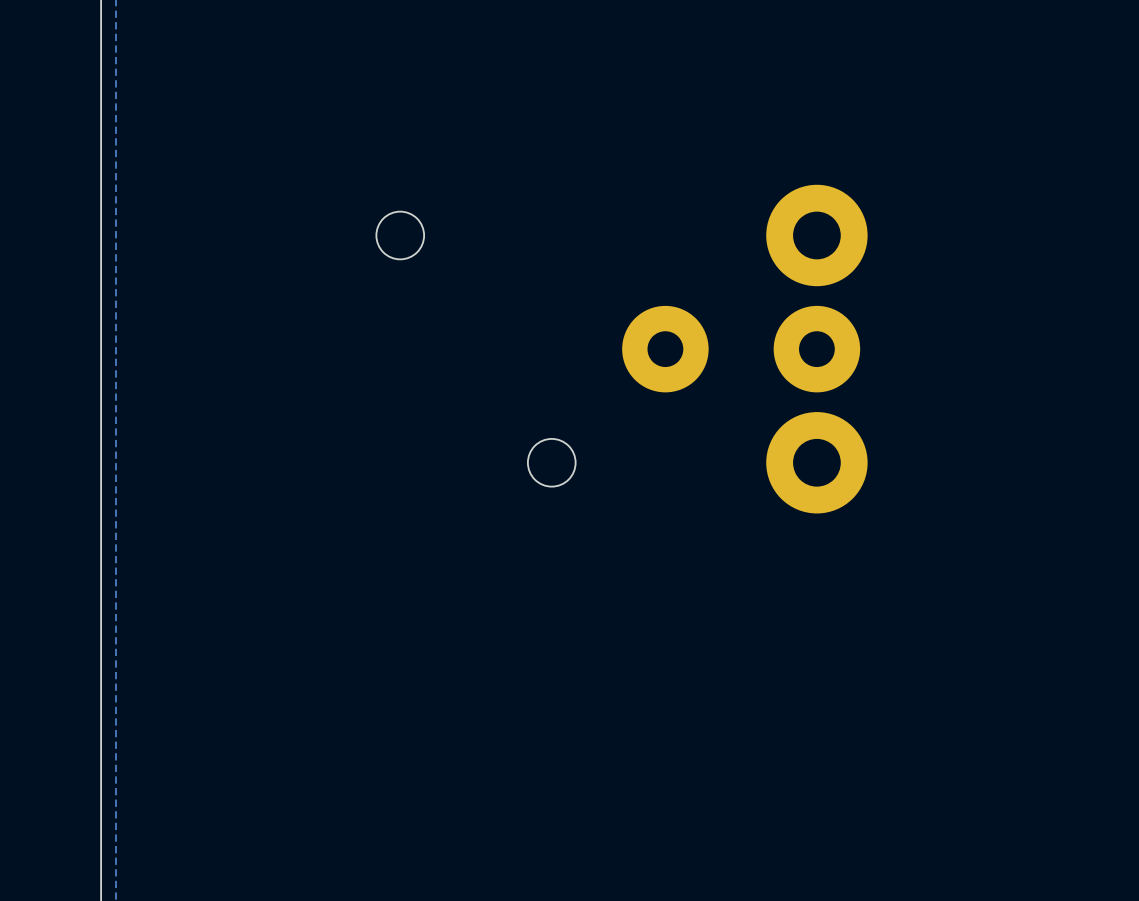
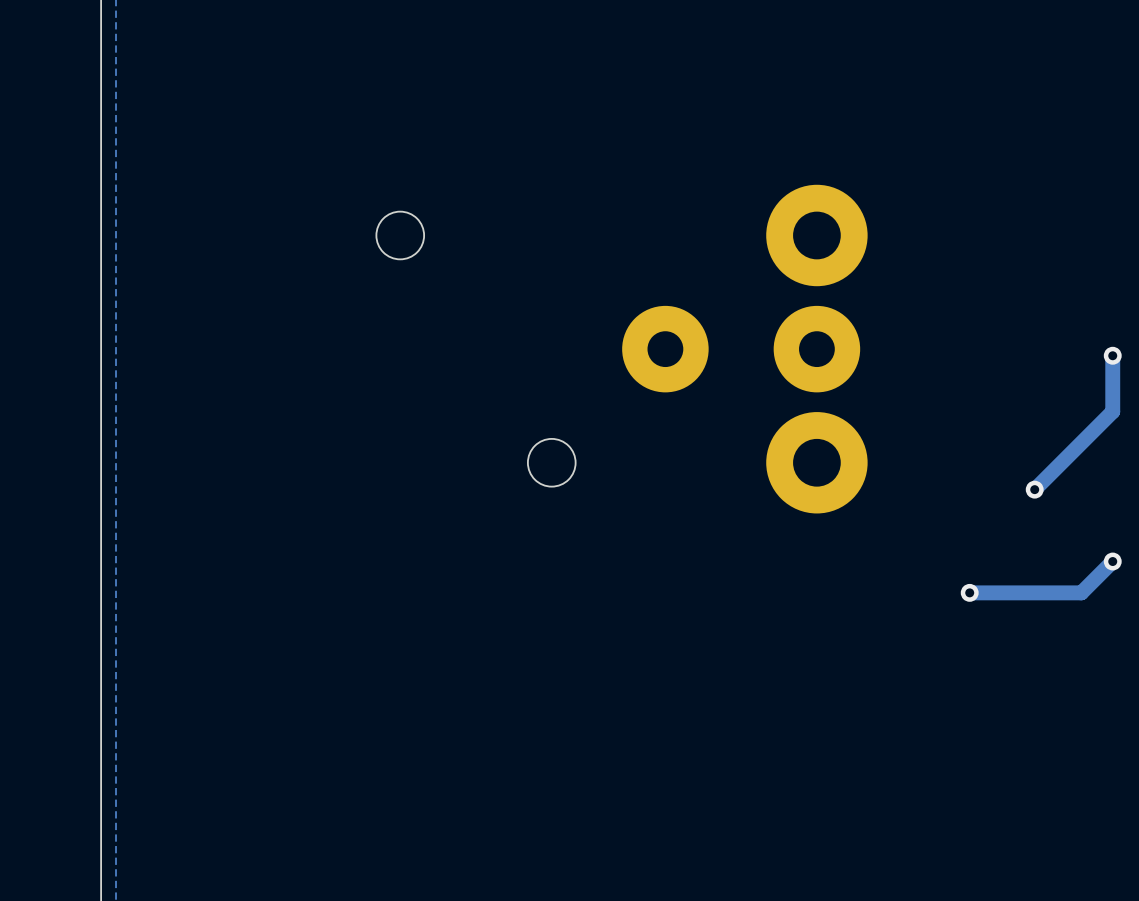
track: none -> (1112, 355) (1112, 411) (1034, 489)
via: none -> (1112, 355)
via: none -> (1034, 489)
track: none -> (1112, 561) (1081, 592) (969, 592)
via: none -> (1112, 561)
via: none -> (969, 592)

